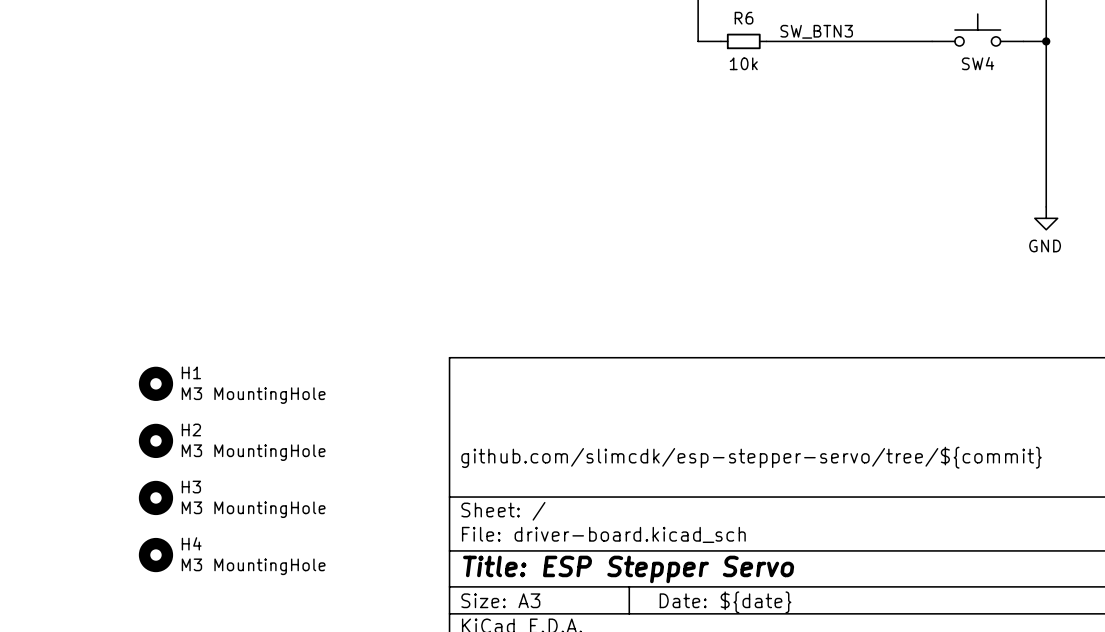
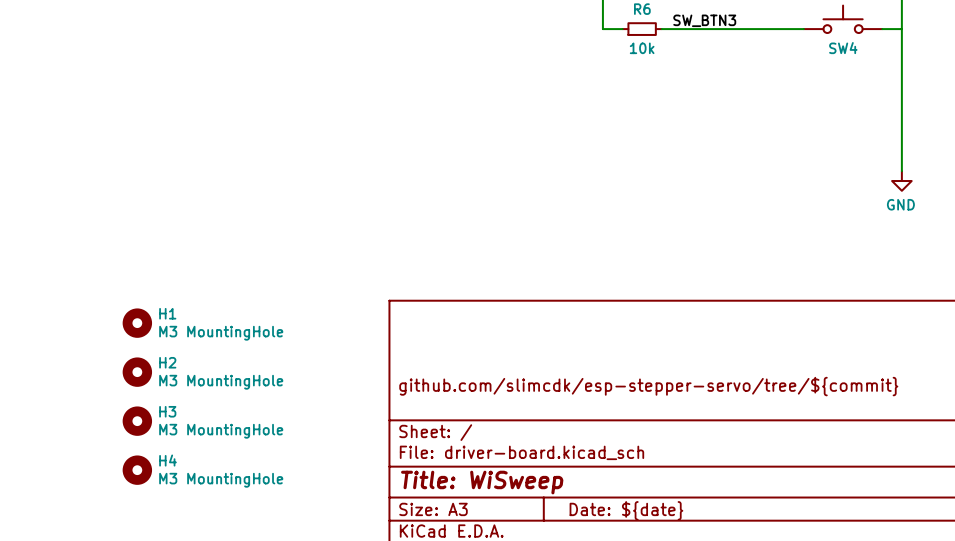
junction: (1046, 41) -> none
title block: Title: ESP Stepper Servo (628, 569) -> Title: WiSweep (482, 482)

